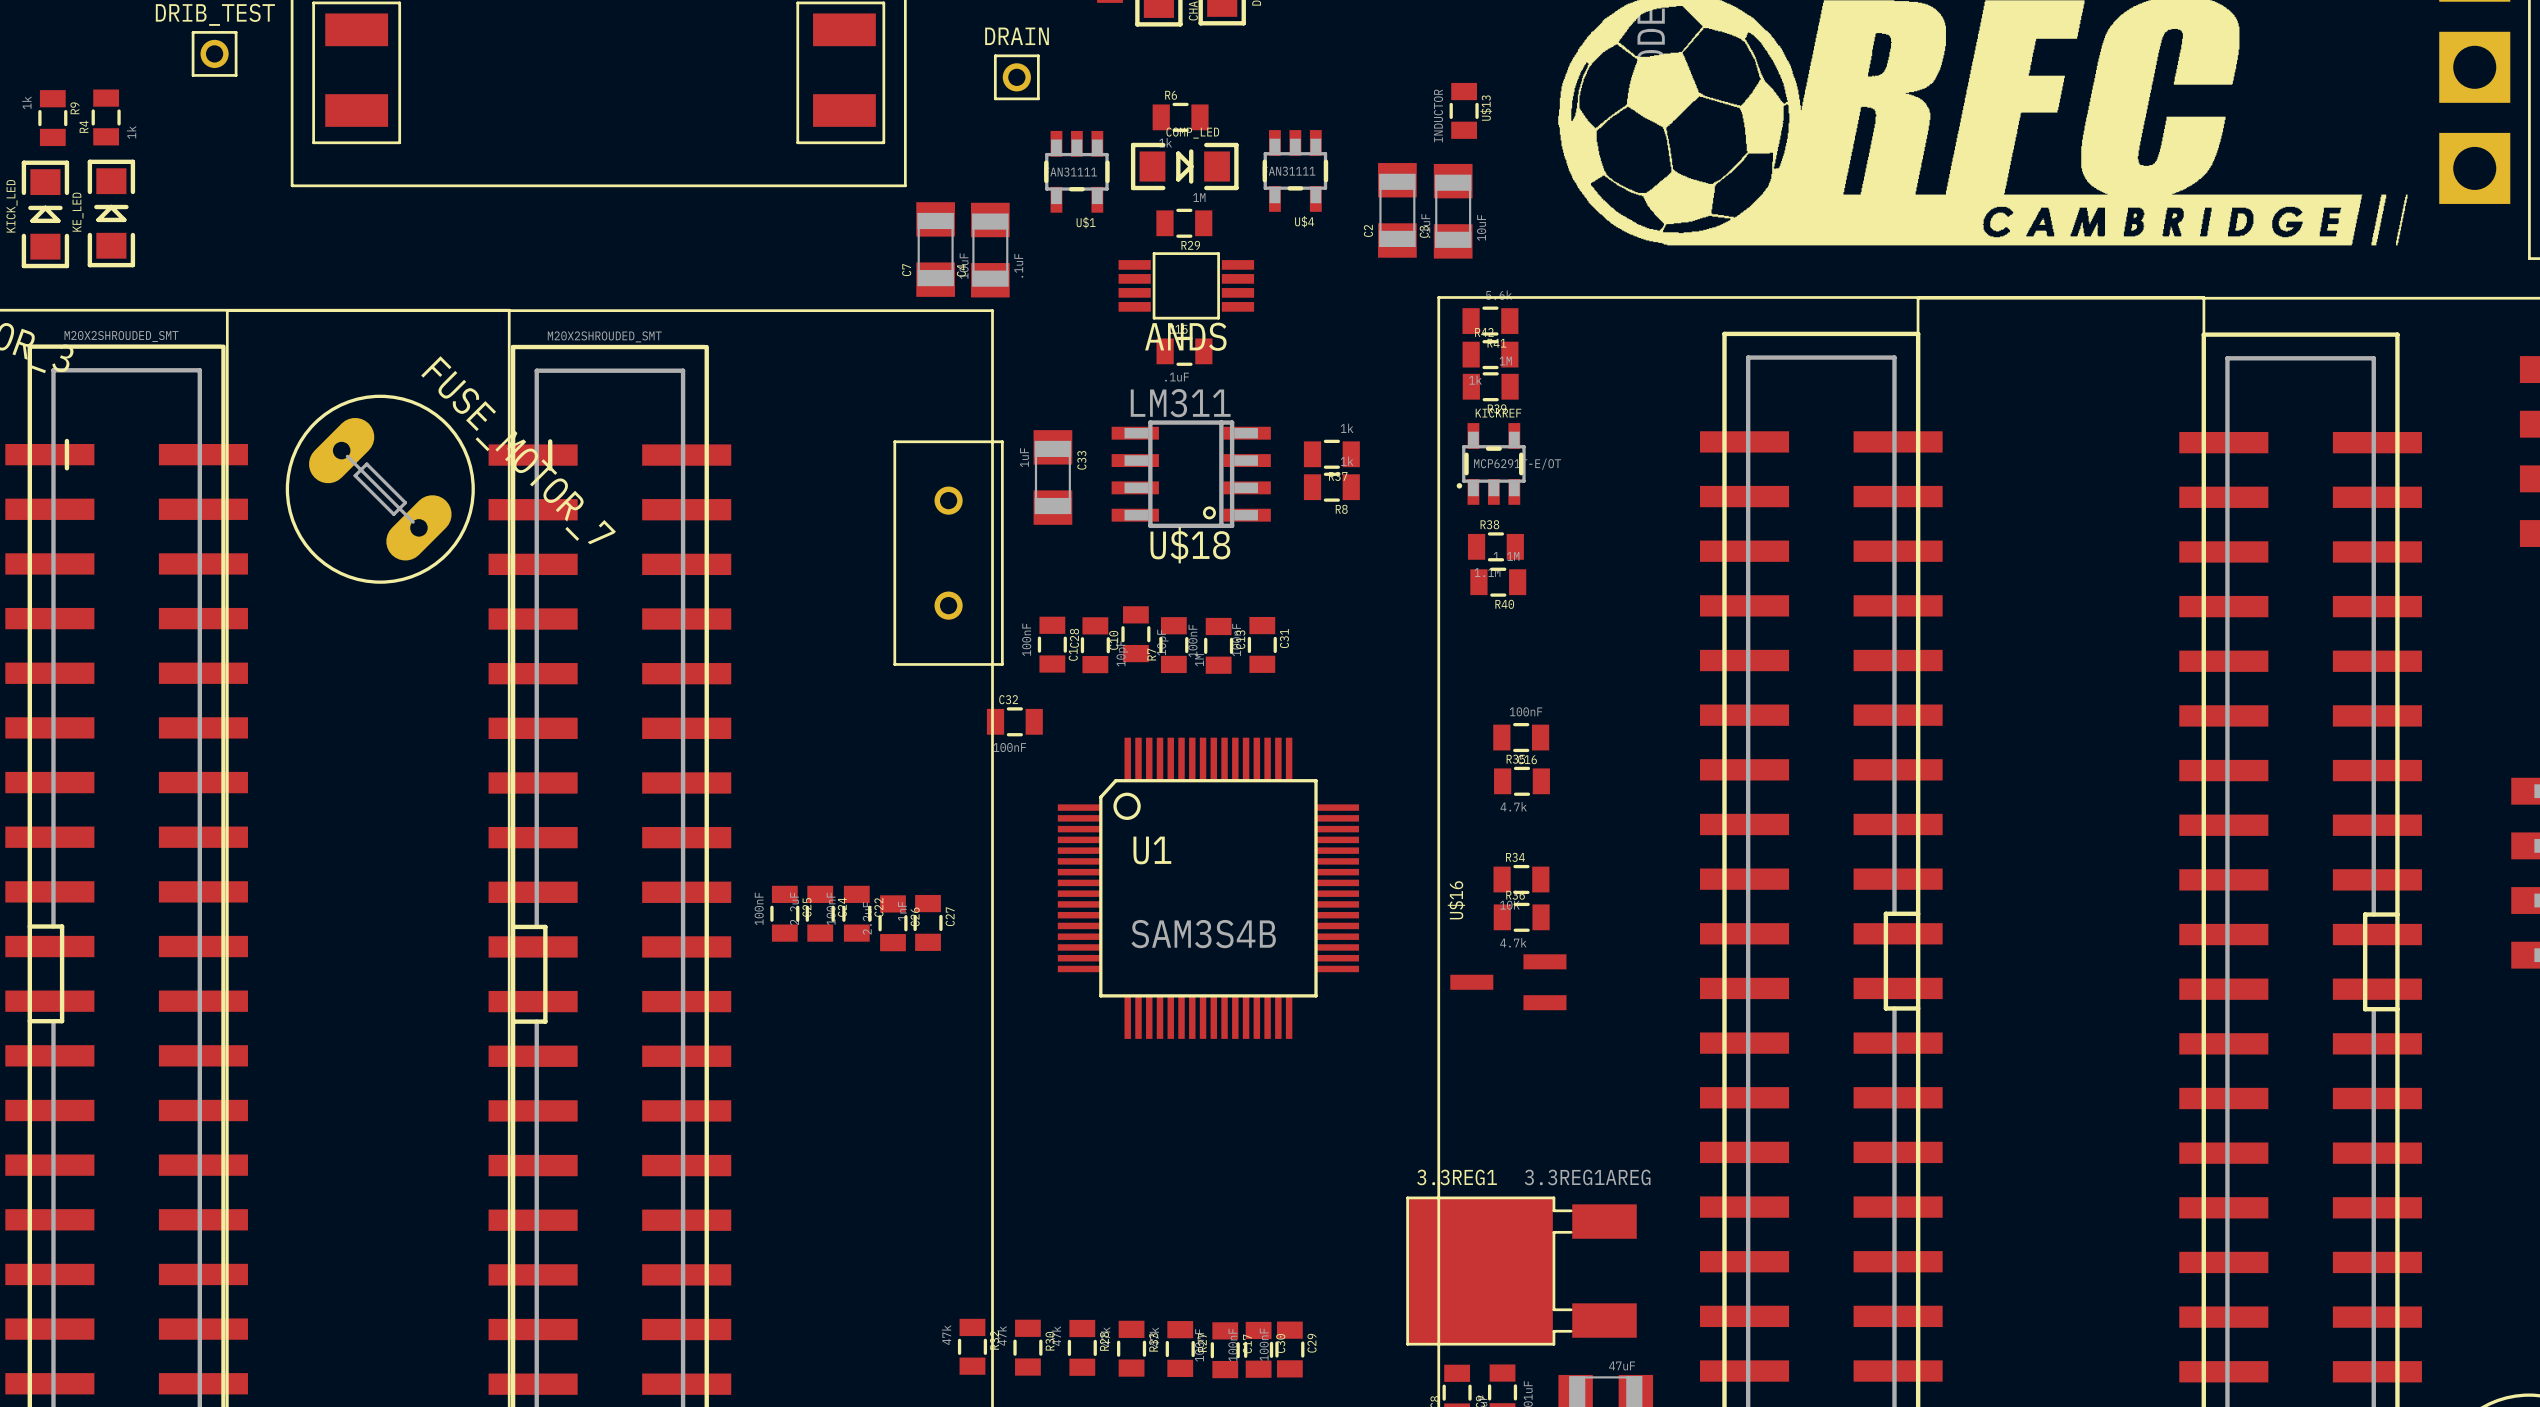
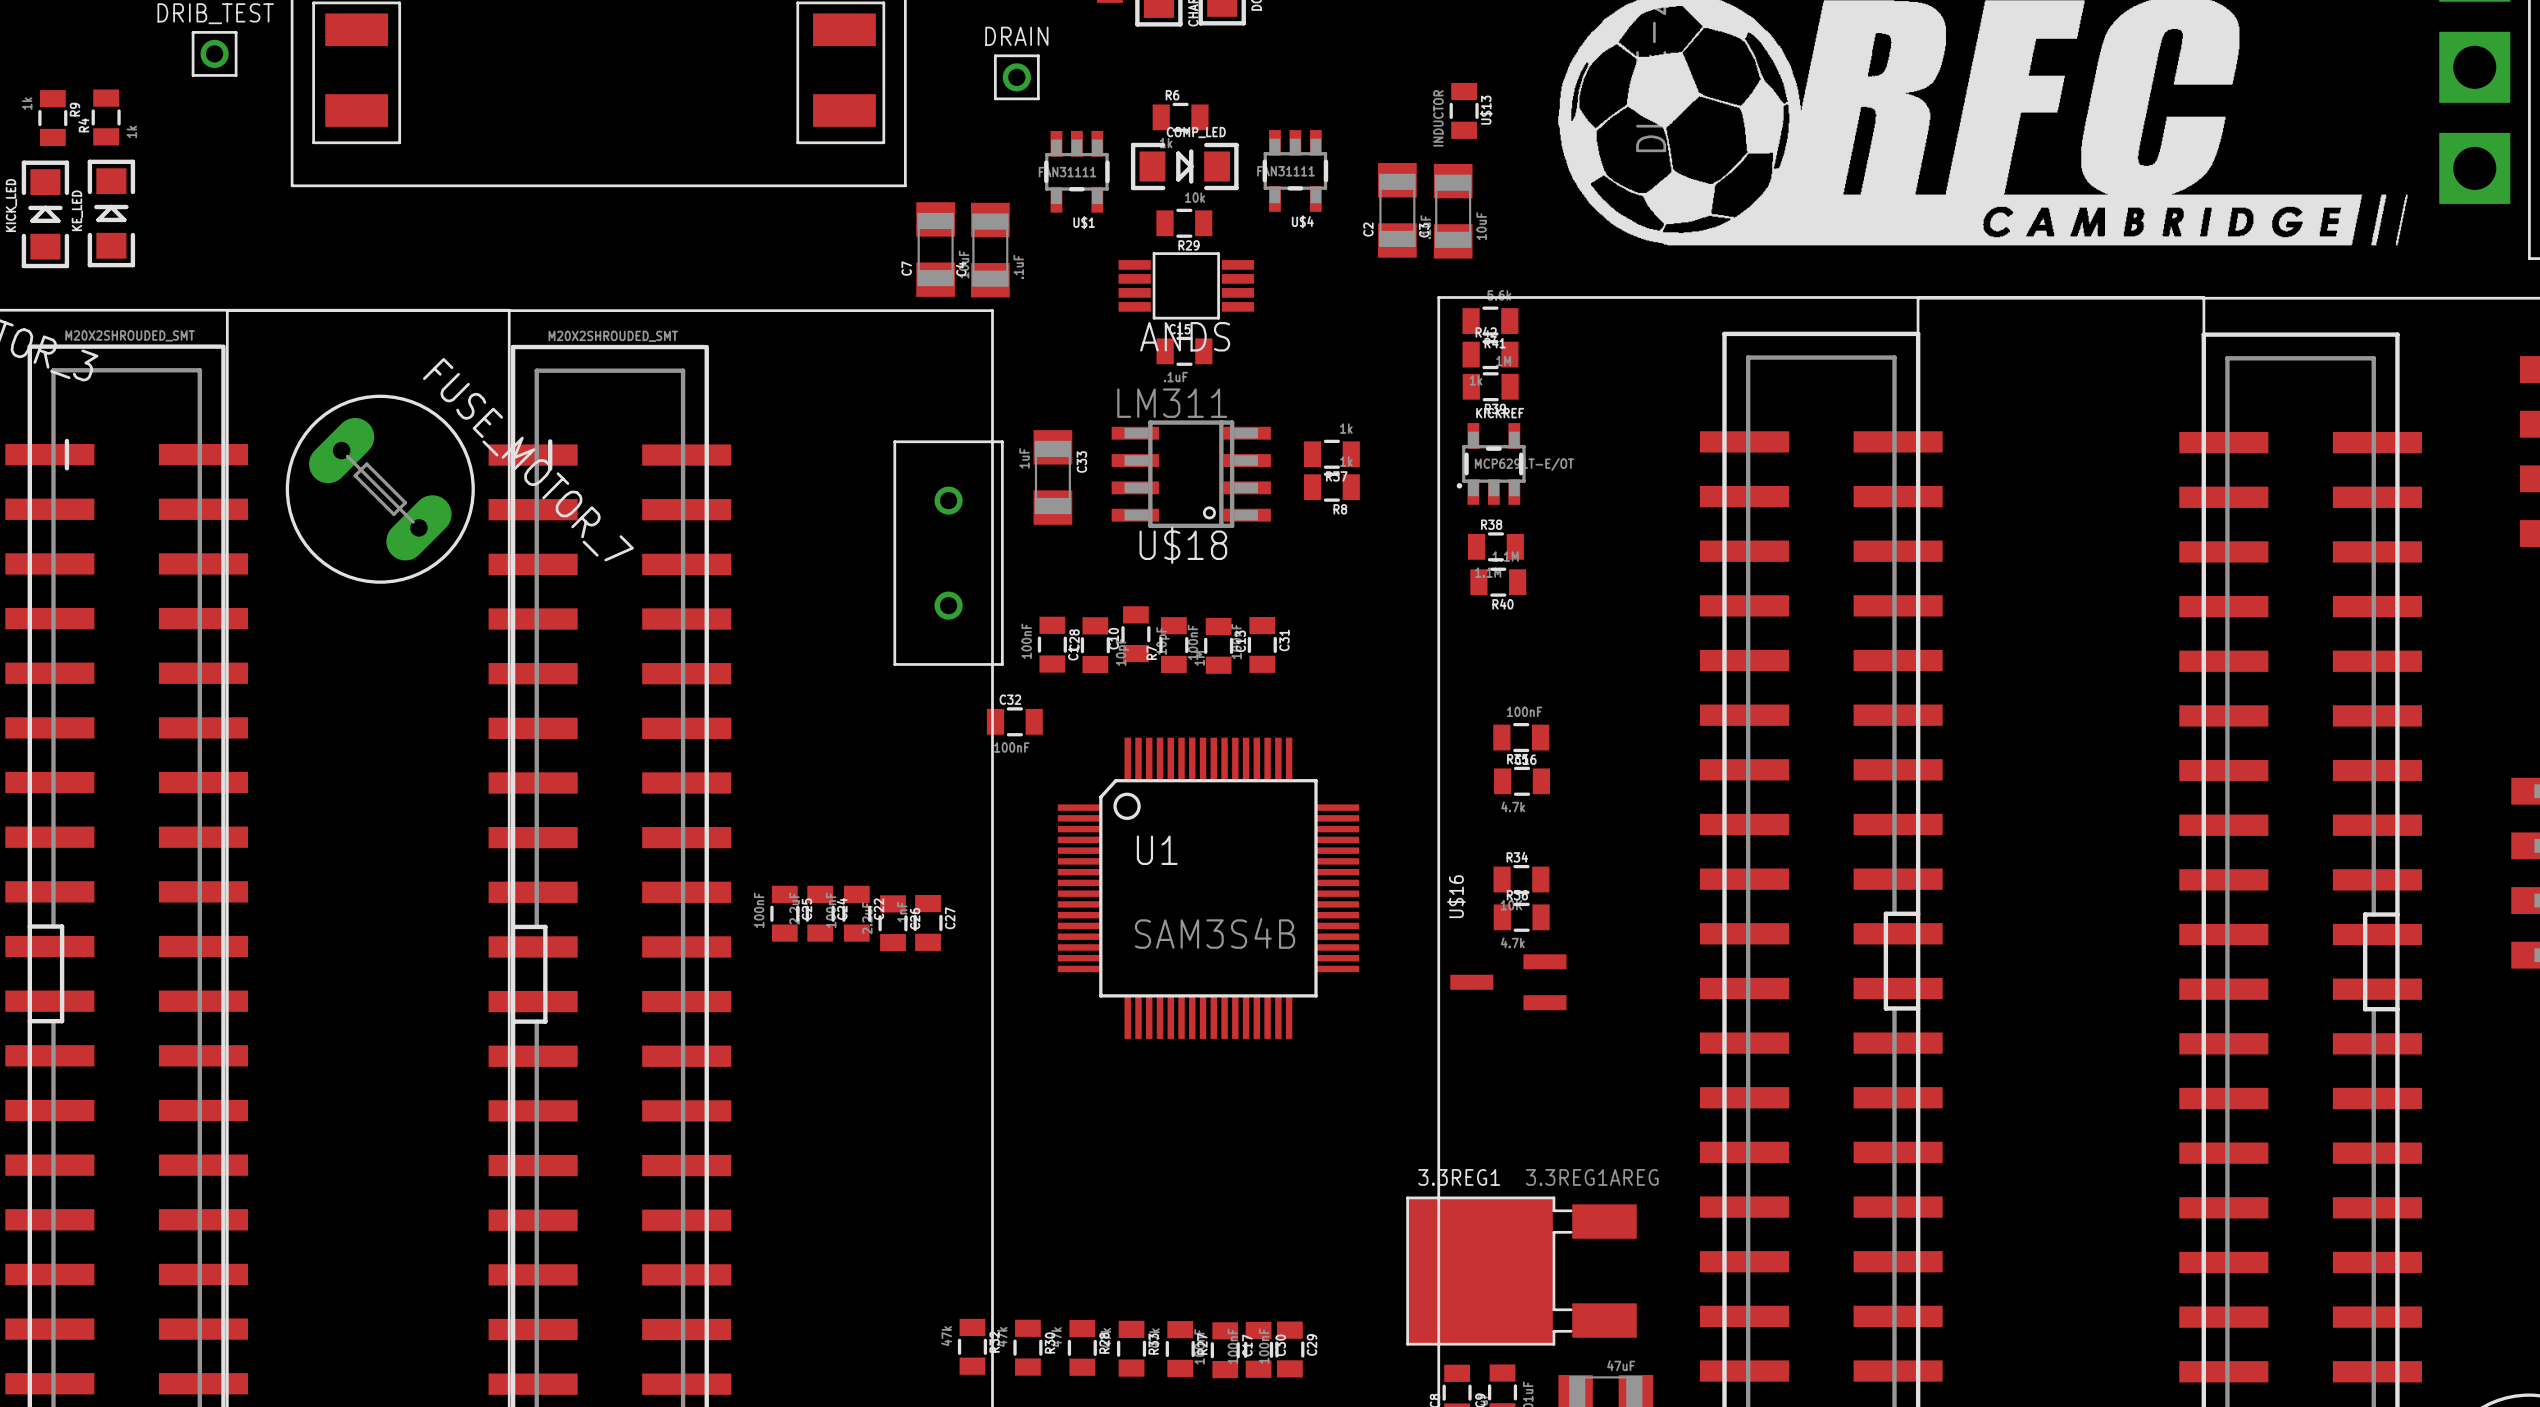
R29 value: 1M (1199, 197) -> 10k (1195, 197)

